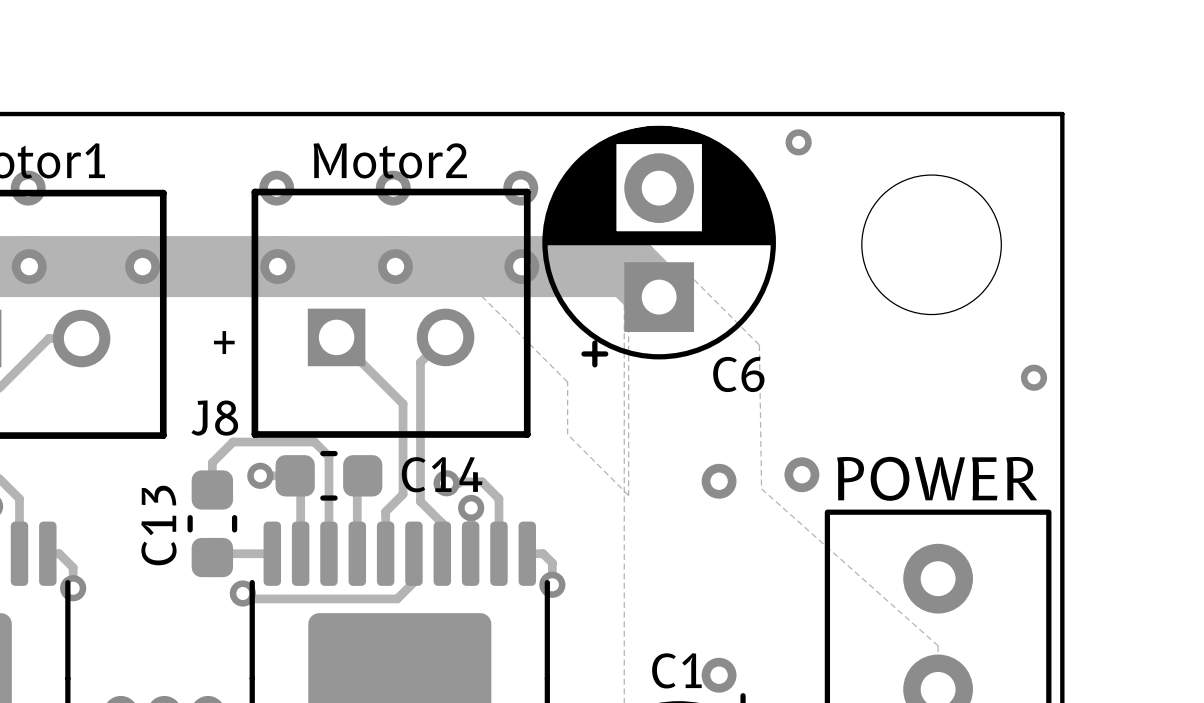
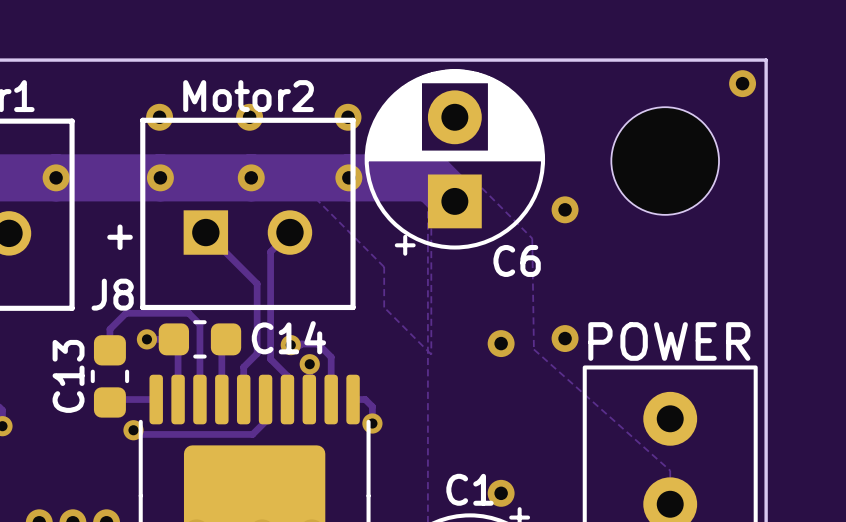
via: (798, 142) -> none
via: none -> (742, 83)
via: none -> (565, 209)
via: (1034, 377) -> none

